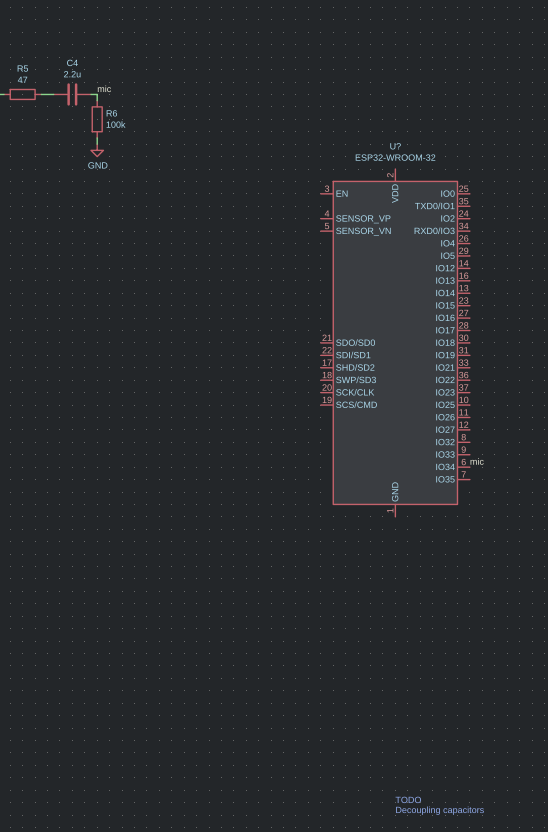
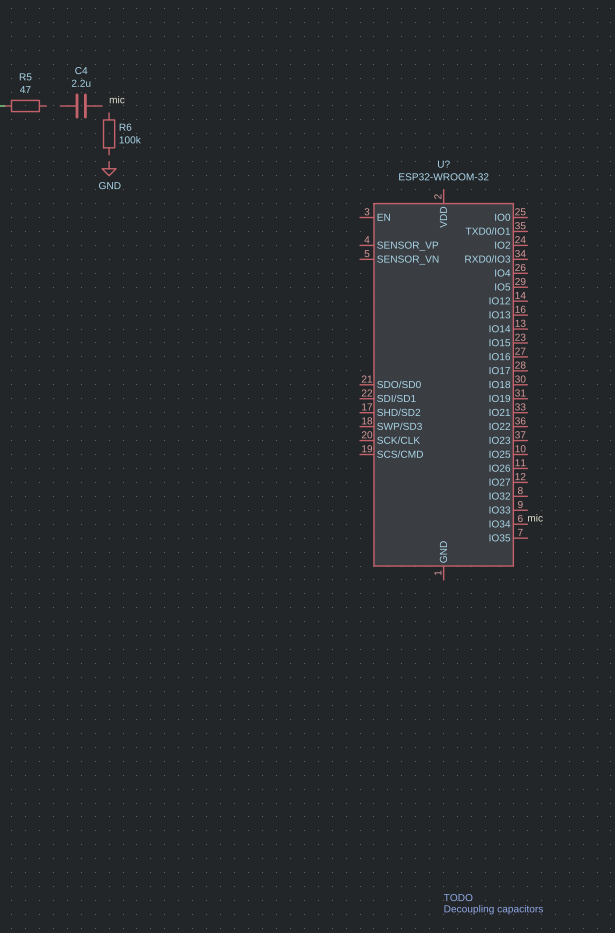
wire: (41, 94) (53, 94) -> none
wire: (91, 94) (97, 94) (97, 100) -> none
wire: (97, 137) (97, 144) -> none

